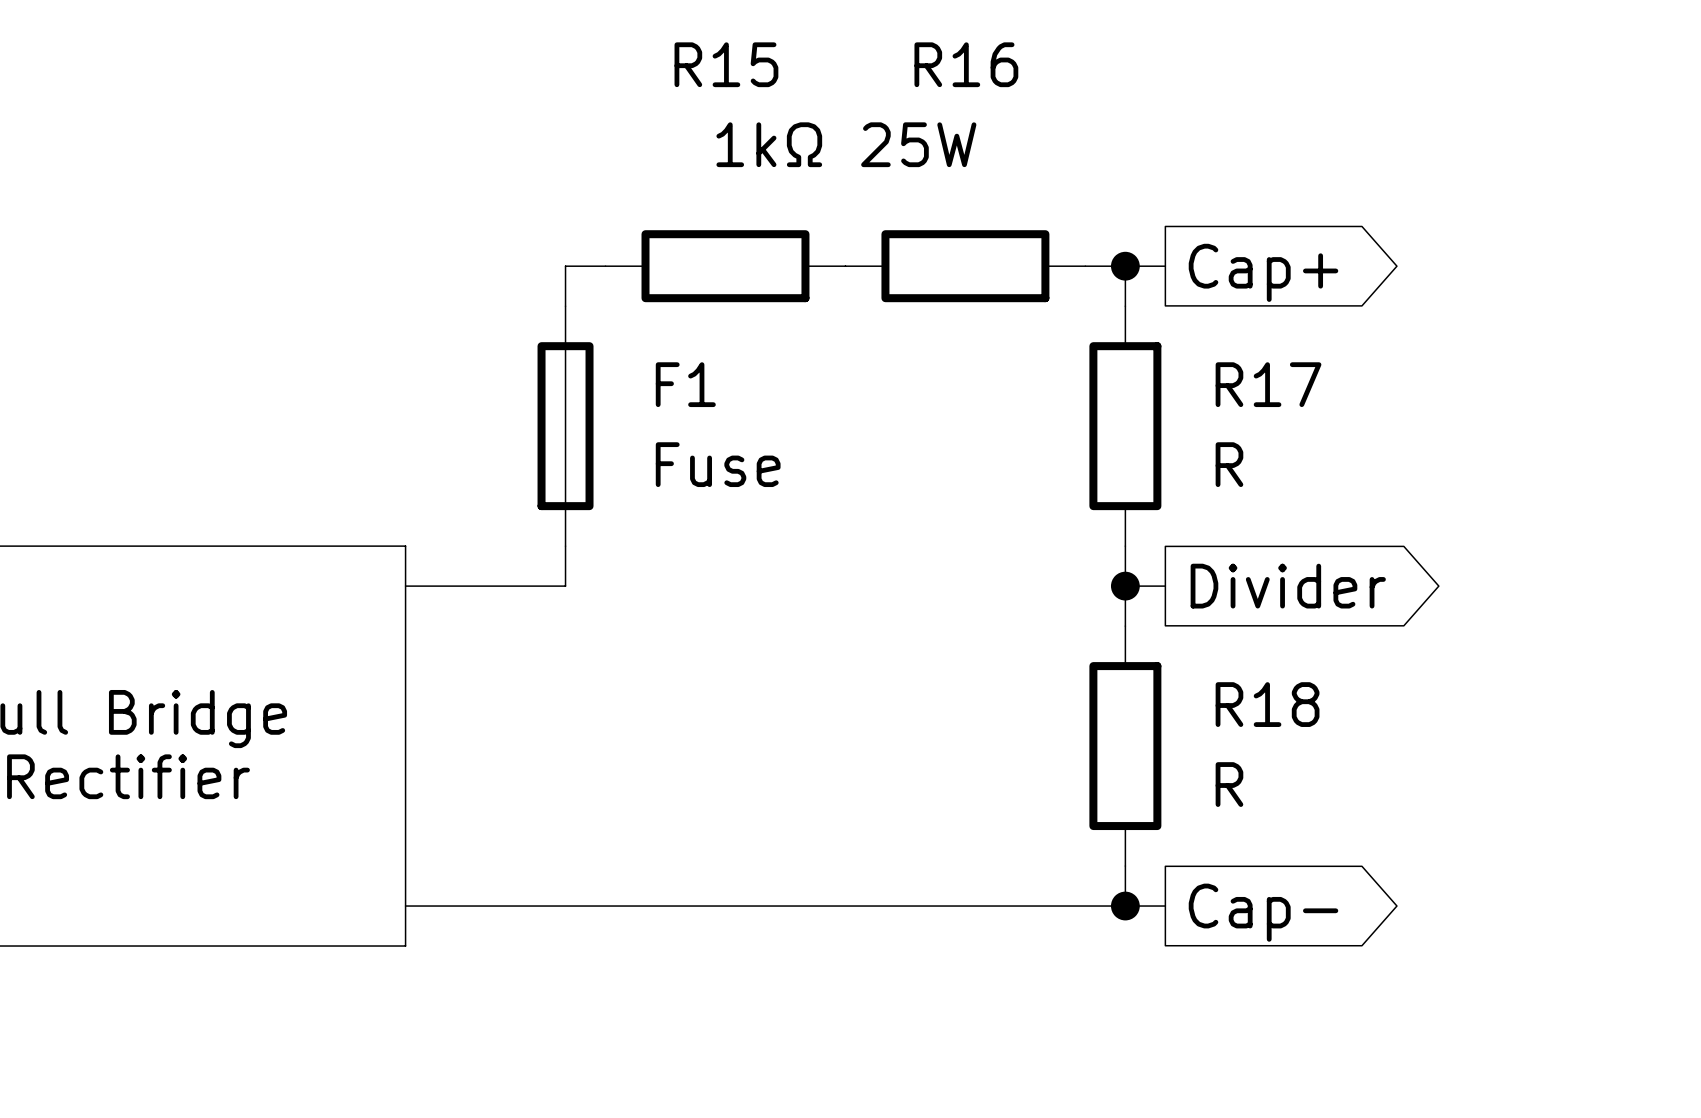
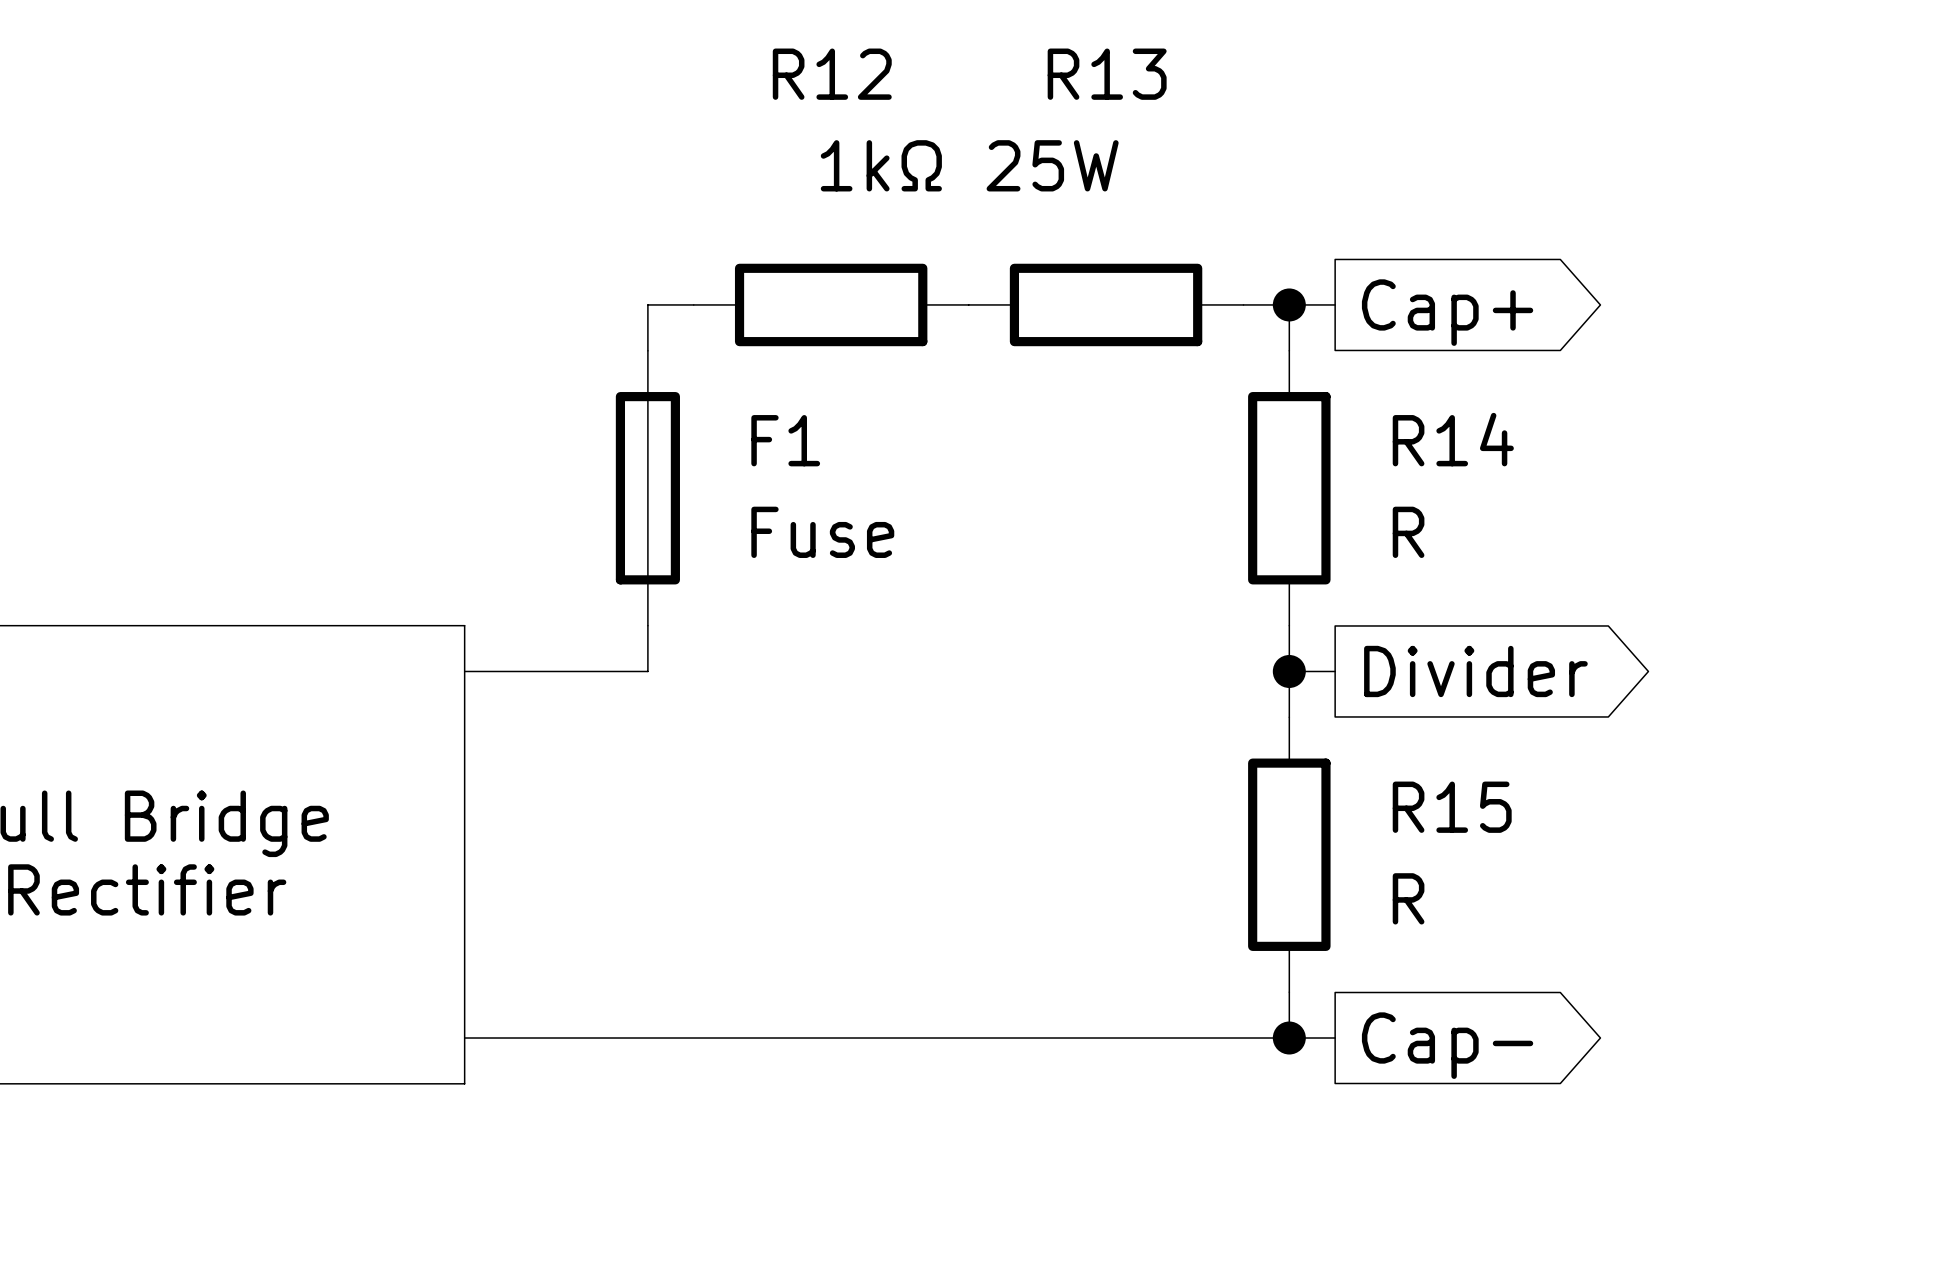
R15 name: R15 (726, 64) -> R12 (832, 74)
R16 name: R16 (966, 64) -> R13 (1107, 74)
R17 name: R17 (1268, 384) -> R14 (1453, 439)
R18 name: R18 (1267, 704) -> R15 (1452, 807)

